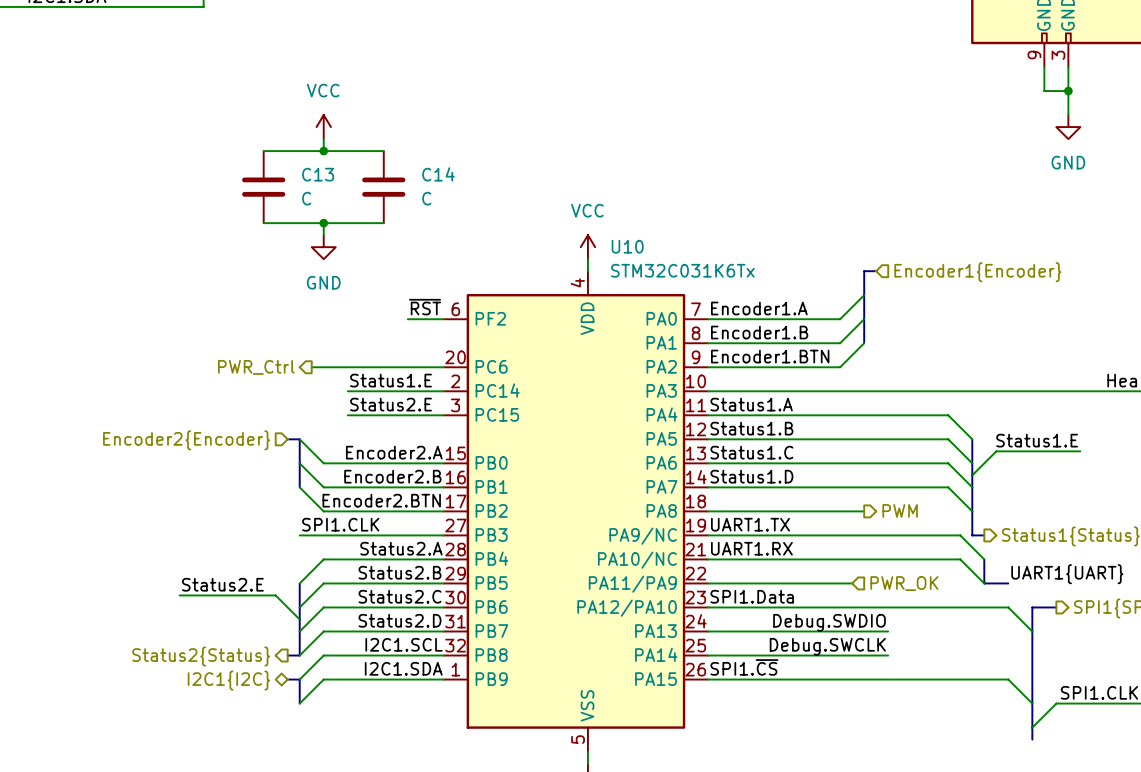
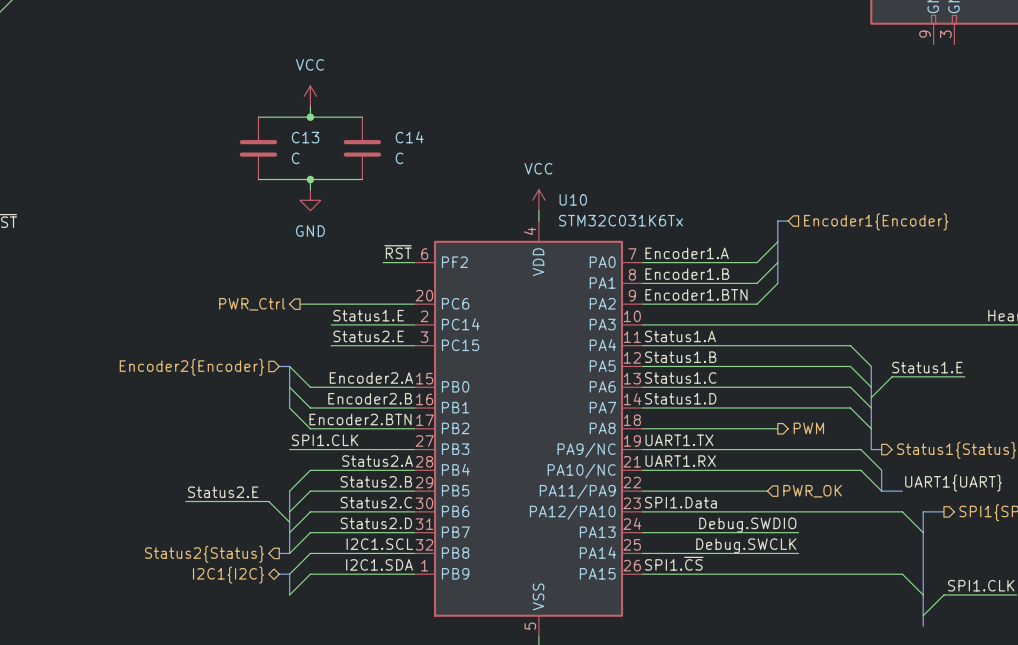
wire: (1044, 67) (1044, 91) (1068, 91) -> none
wire: (1068, 67) (1068, 115) -> none
junction: (1068, 91) -> none
power symbol: GND (1068, 127) -> none

